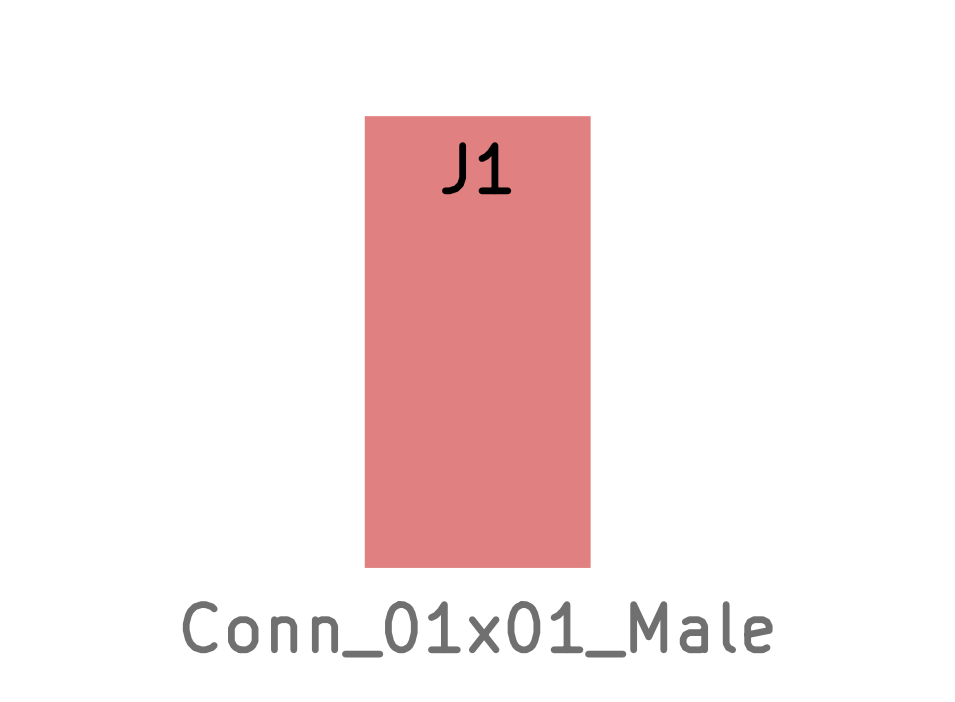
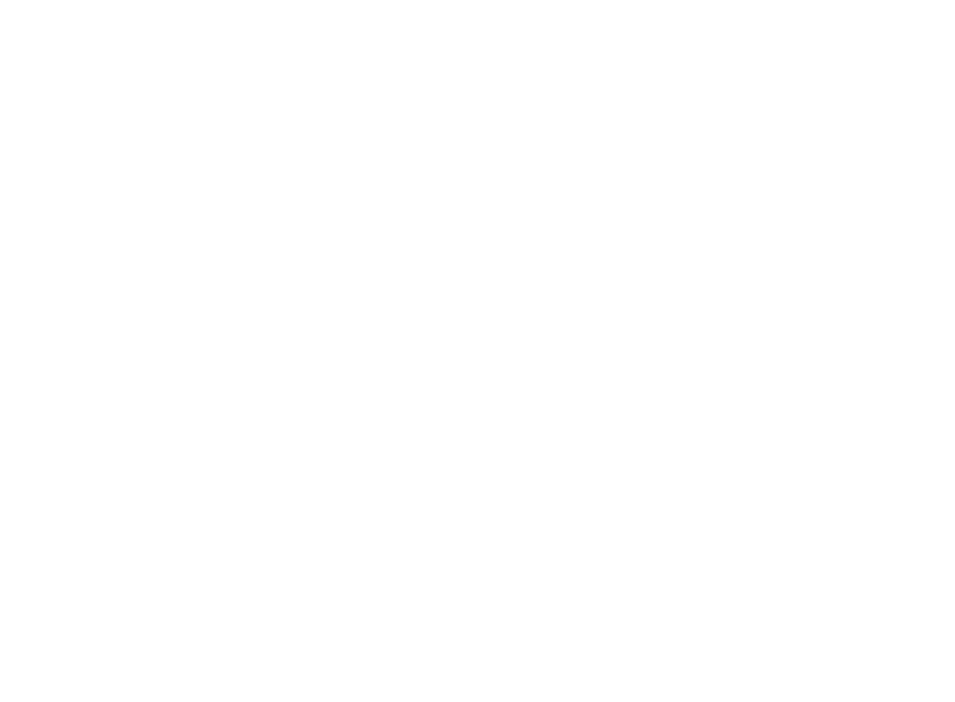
J1: Conn_01x01_Male (477, 342) -> none

